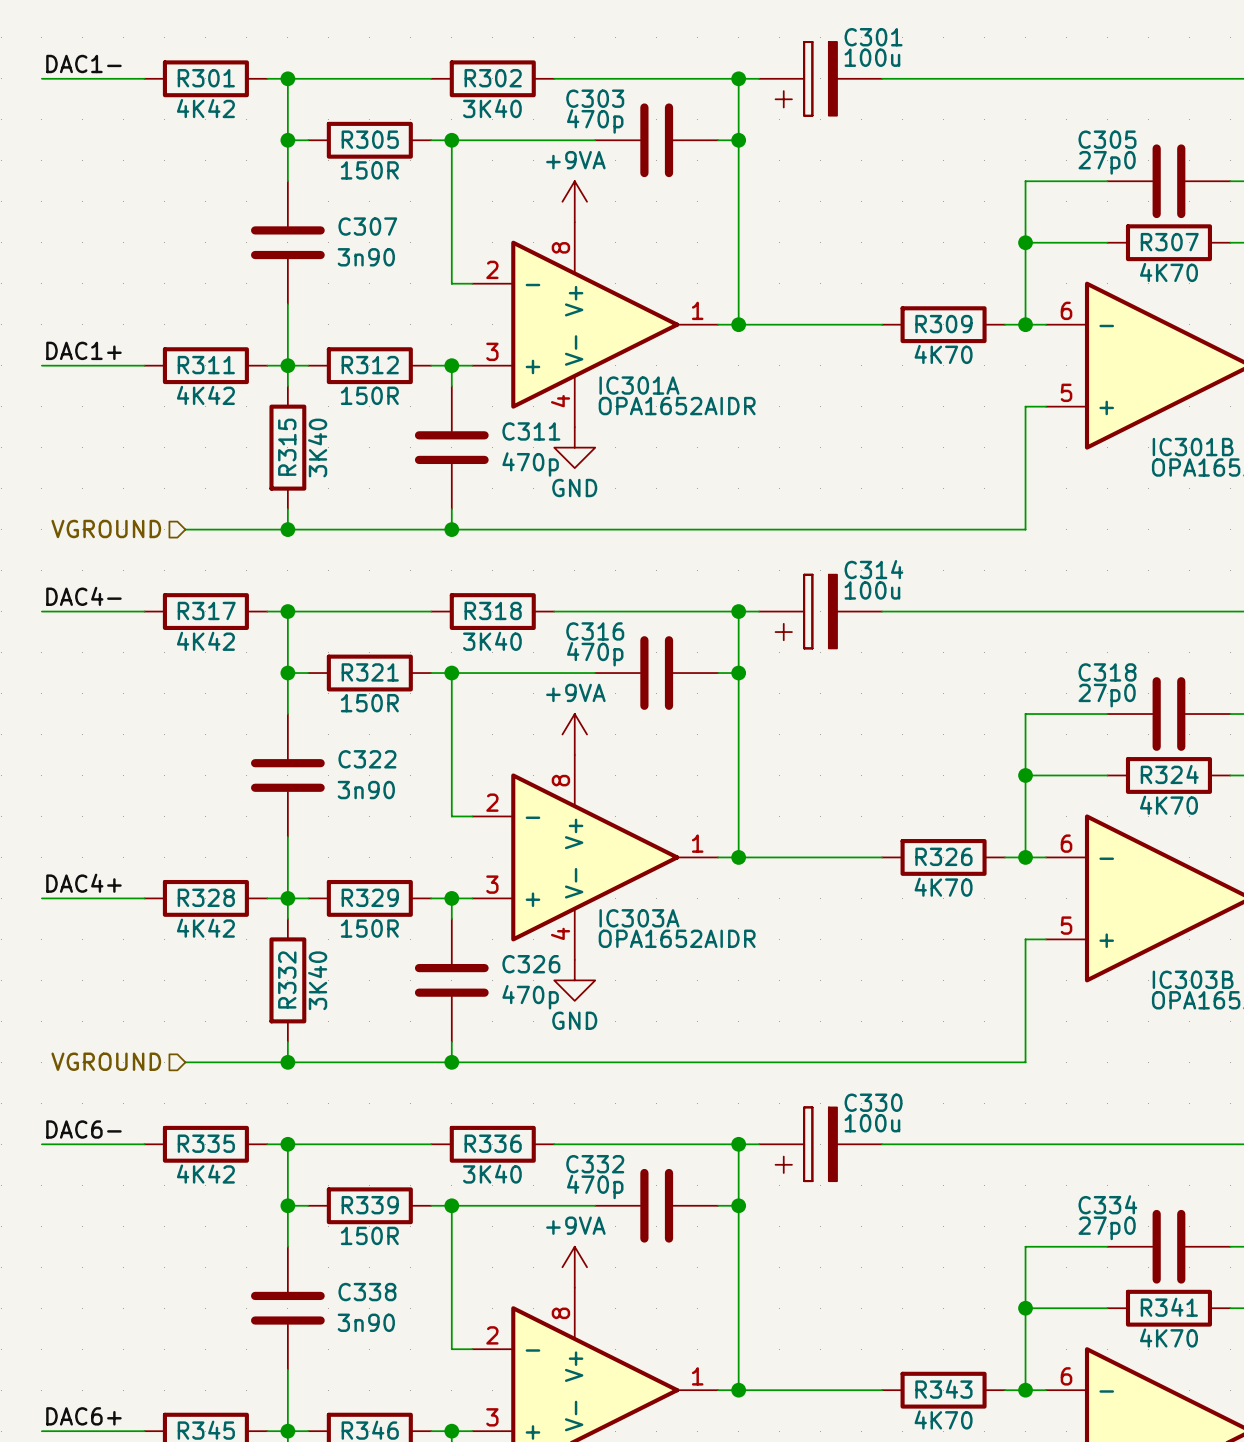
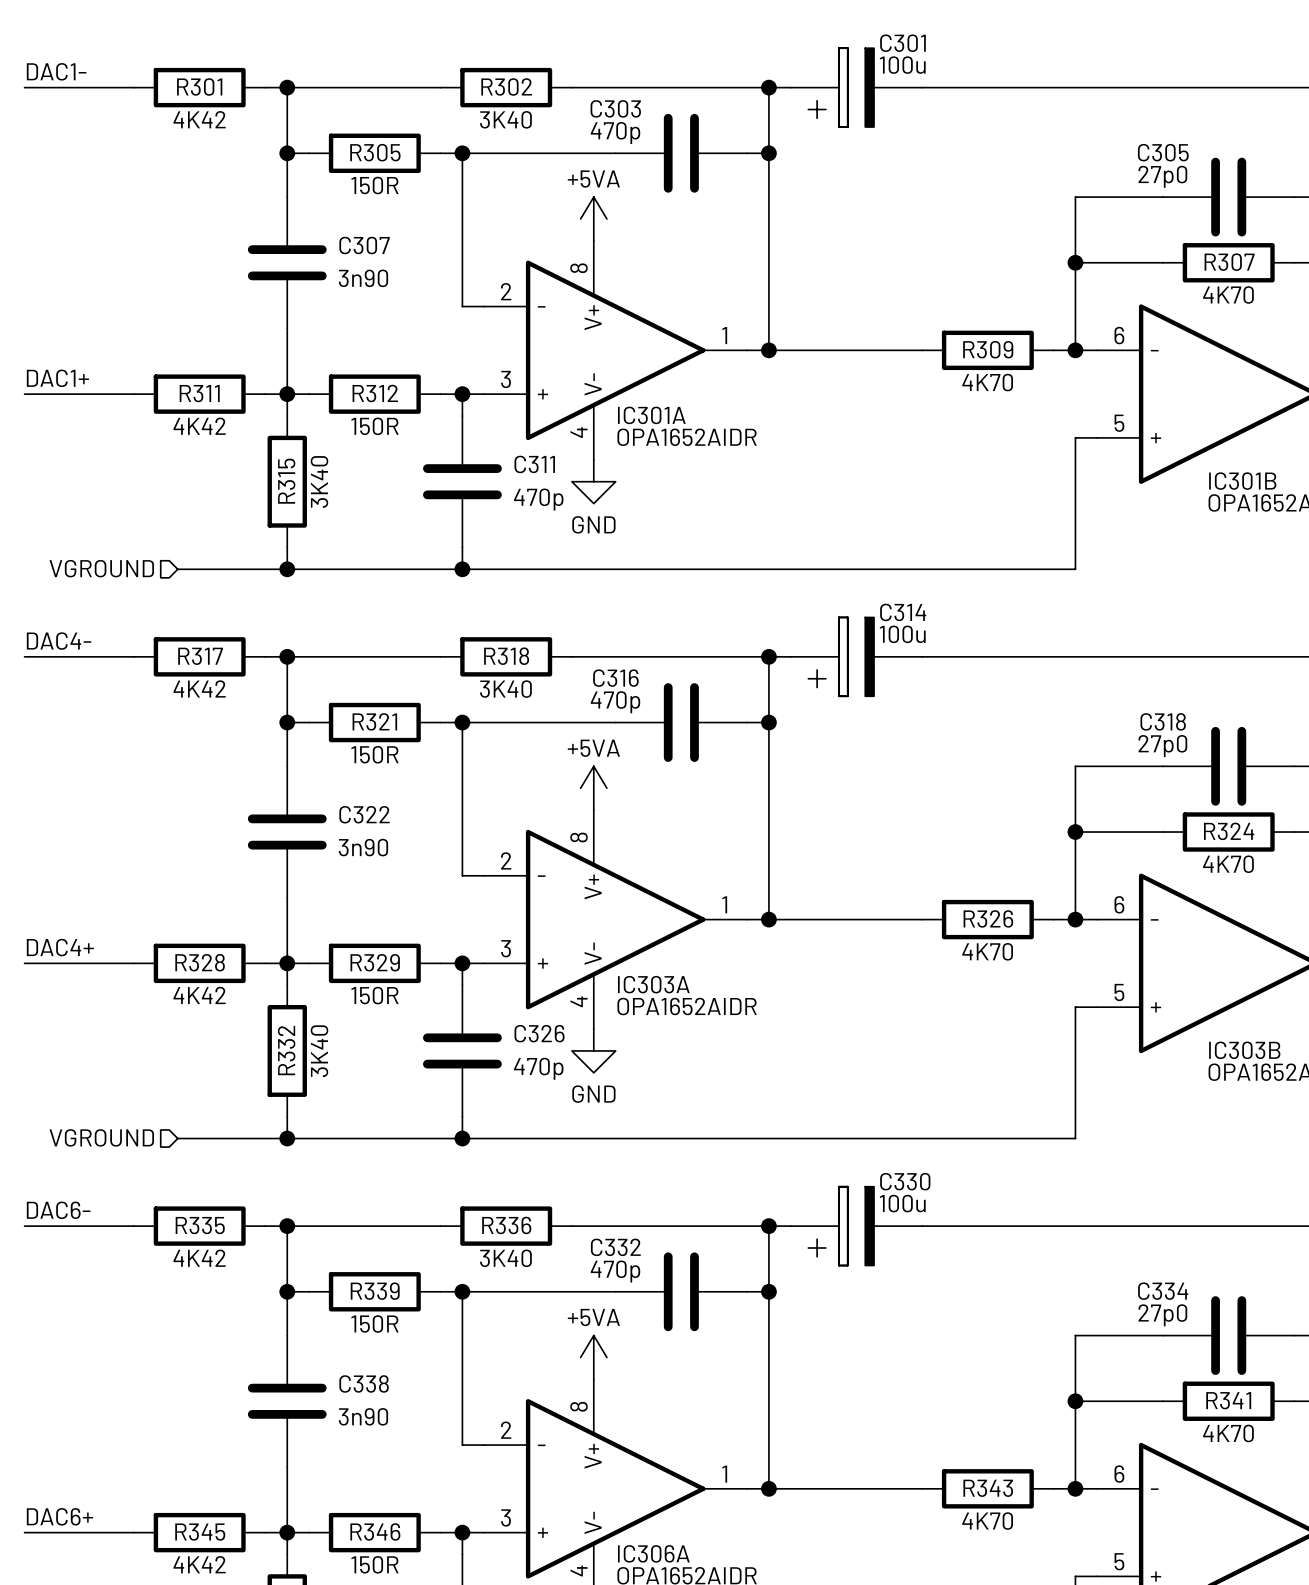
power symbol: +9VA (574, 201) -> +5VA (593, 218)
power symbol: +9VA (574, 734) -> +5VA (593, 788)
power symbol: +9VA (574, 1267) -> +5VA (593, 1357)

